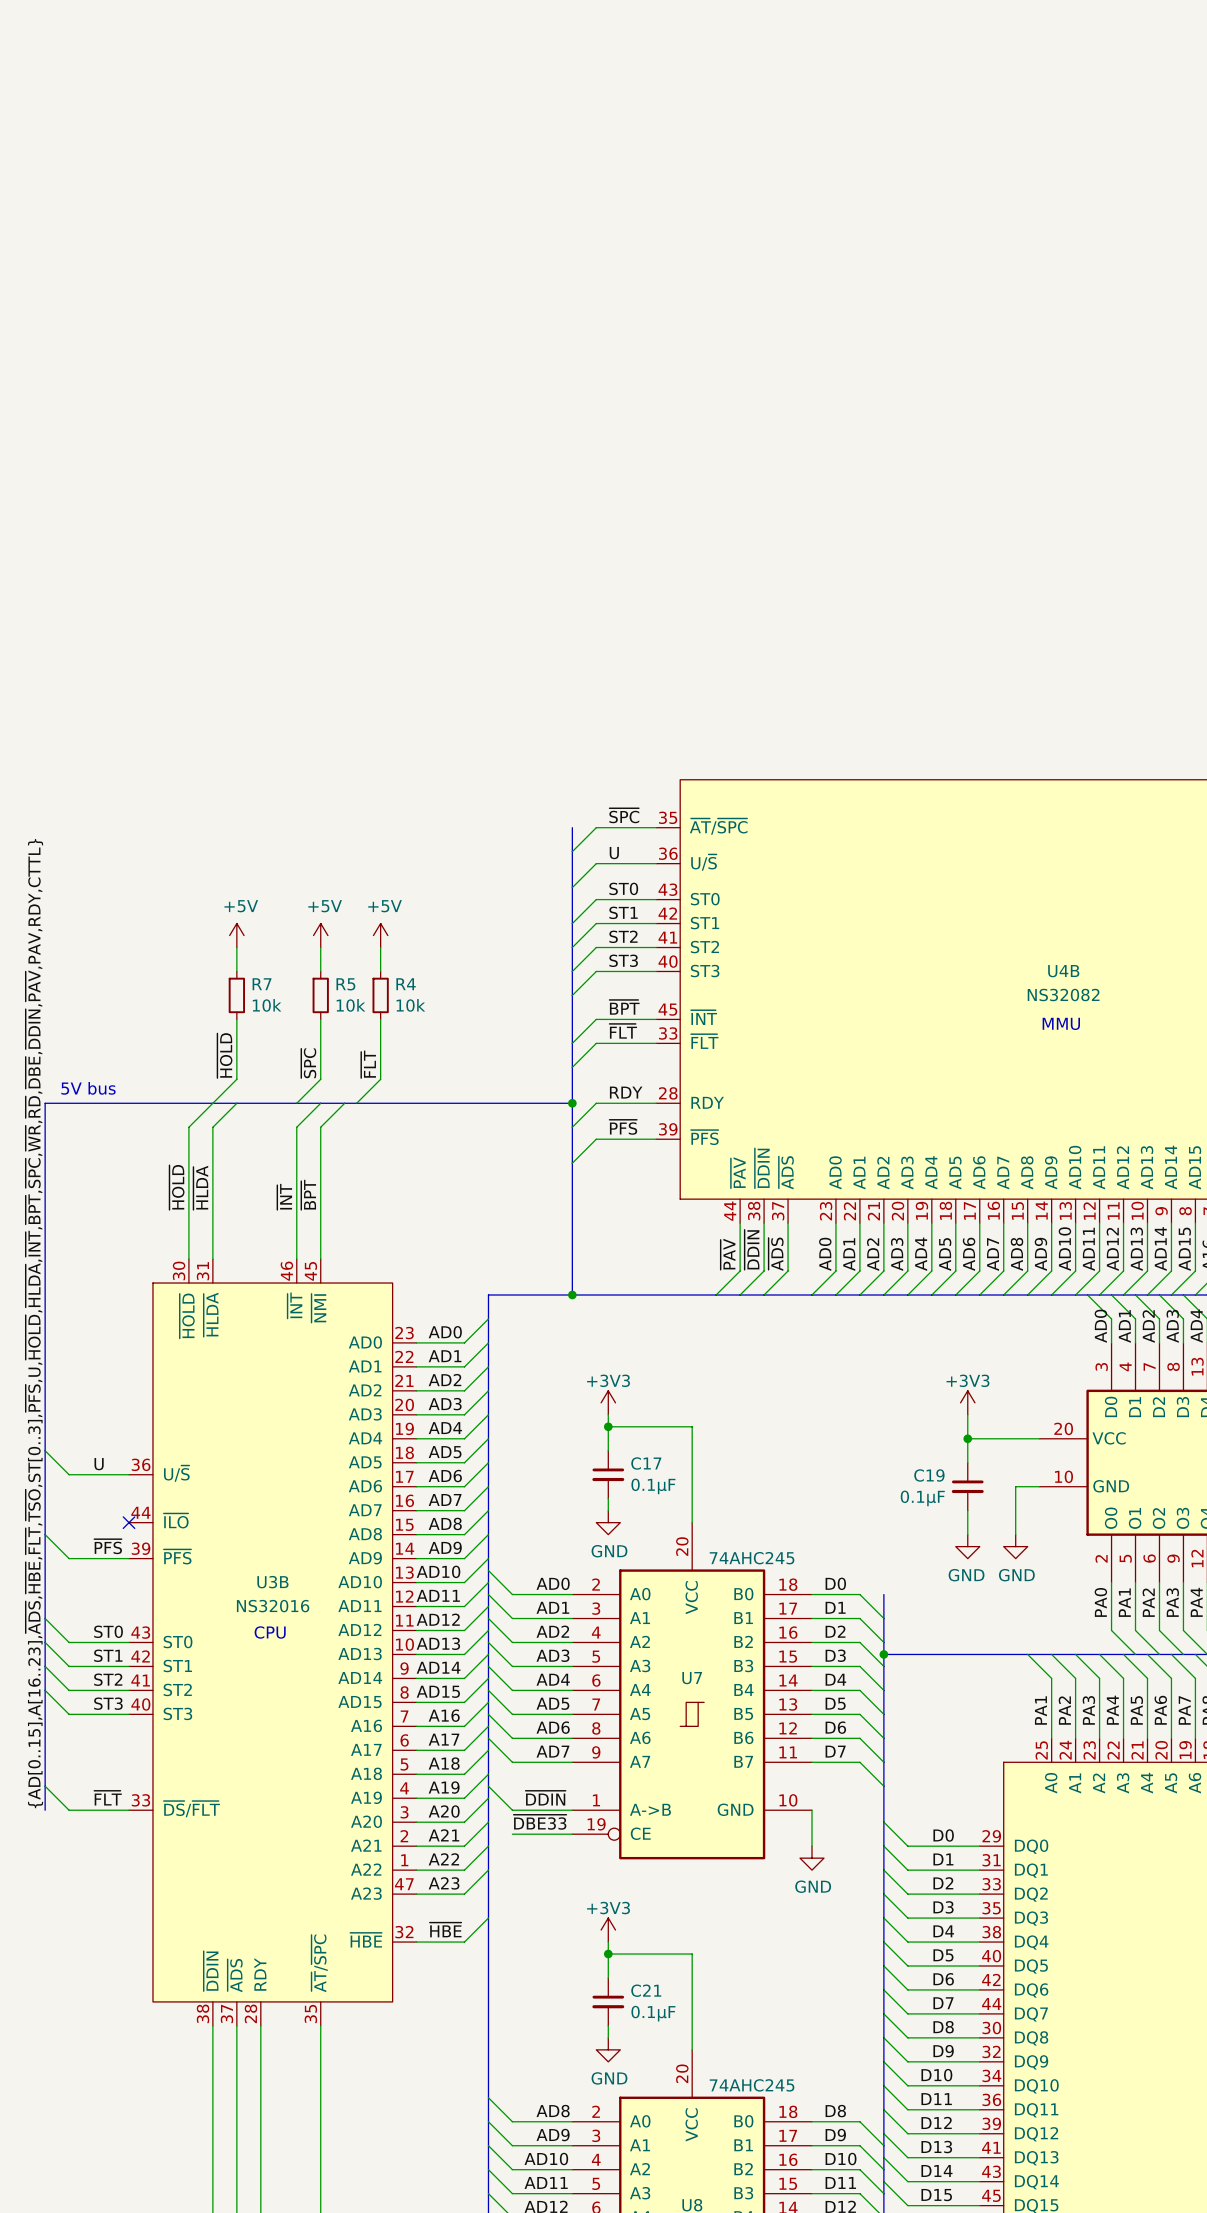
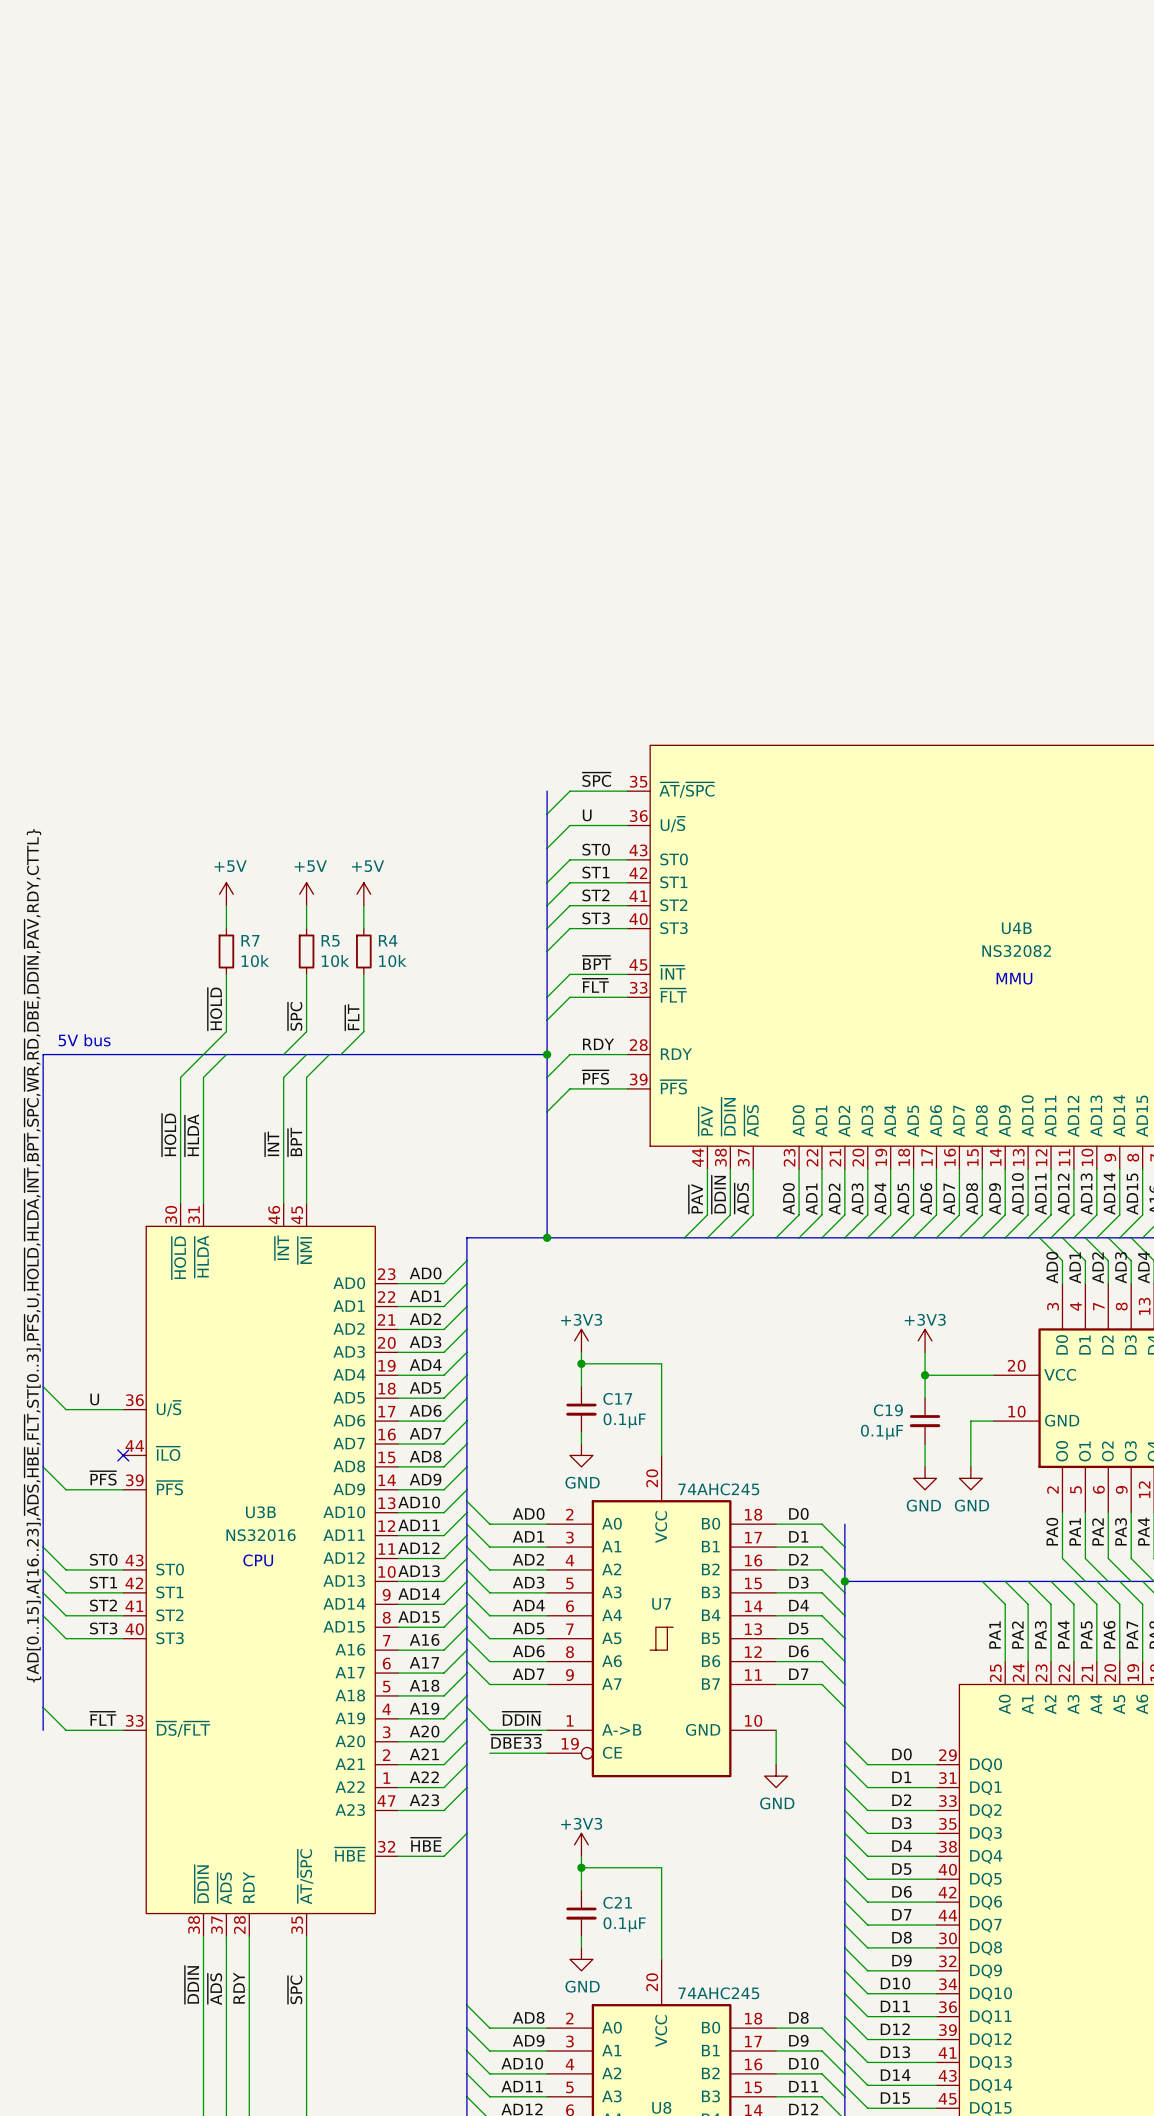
label: {AD[0..15],A[16..23],~{ADS},~{HBE},~{FLT},~{TSO},ST[0..3],~{PFS},U,~{HOLD},~{HLDA},~{INT},~{BPT},~{SPC},~{WR},~{RD},~{DBE},~{DDIN},~{PAV},PAV,RDY,CTTL} (34, 1323) -> {AD[0..15],A[16..23],~{ADS},~{HBE},~{FLT},ST[0..3],~{PFS},U,~{HOLD},~{HLDA},~{INT},~{BPT},~{SPC},~{WR},~{RD},~{DBE},~{DDIN},~{PAV},RDY,CTTL} (32, 1255)
label: none -> ~{DDIN} (191, 1984)
label: none -> RDY (239, 1988)
label: none -> ~{ADS} (214, 1989)
label: none -> ~{SPC} (295, 1989)

